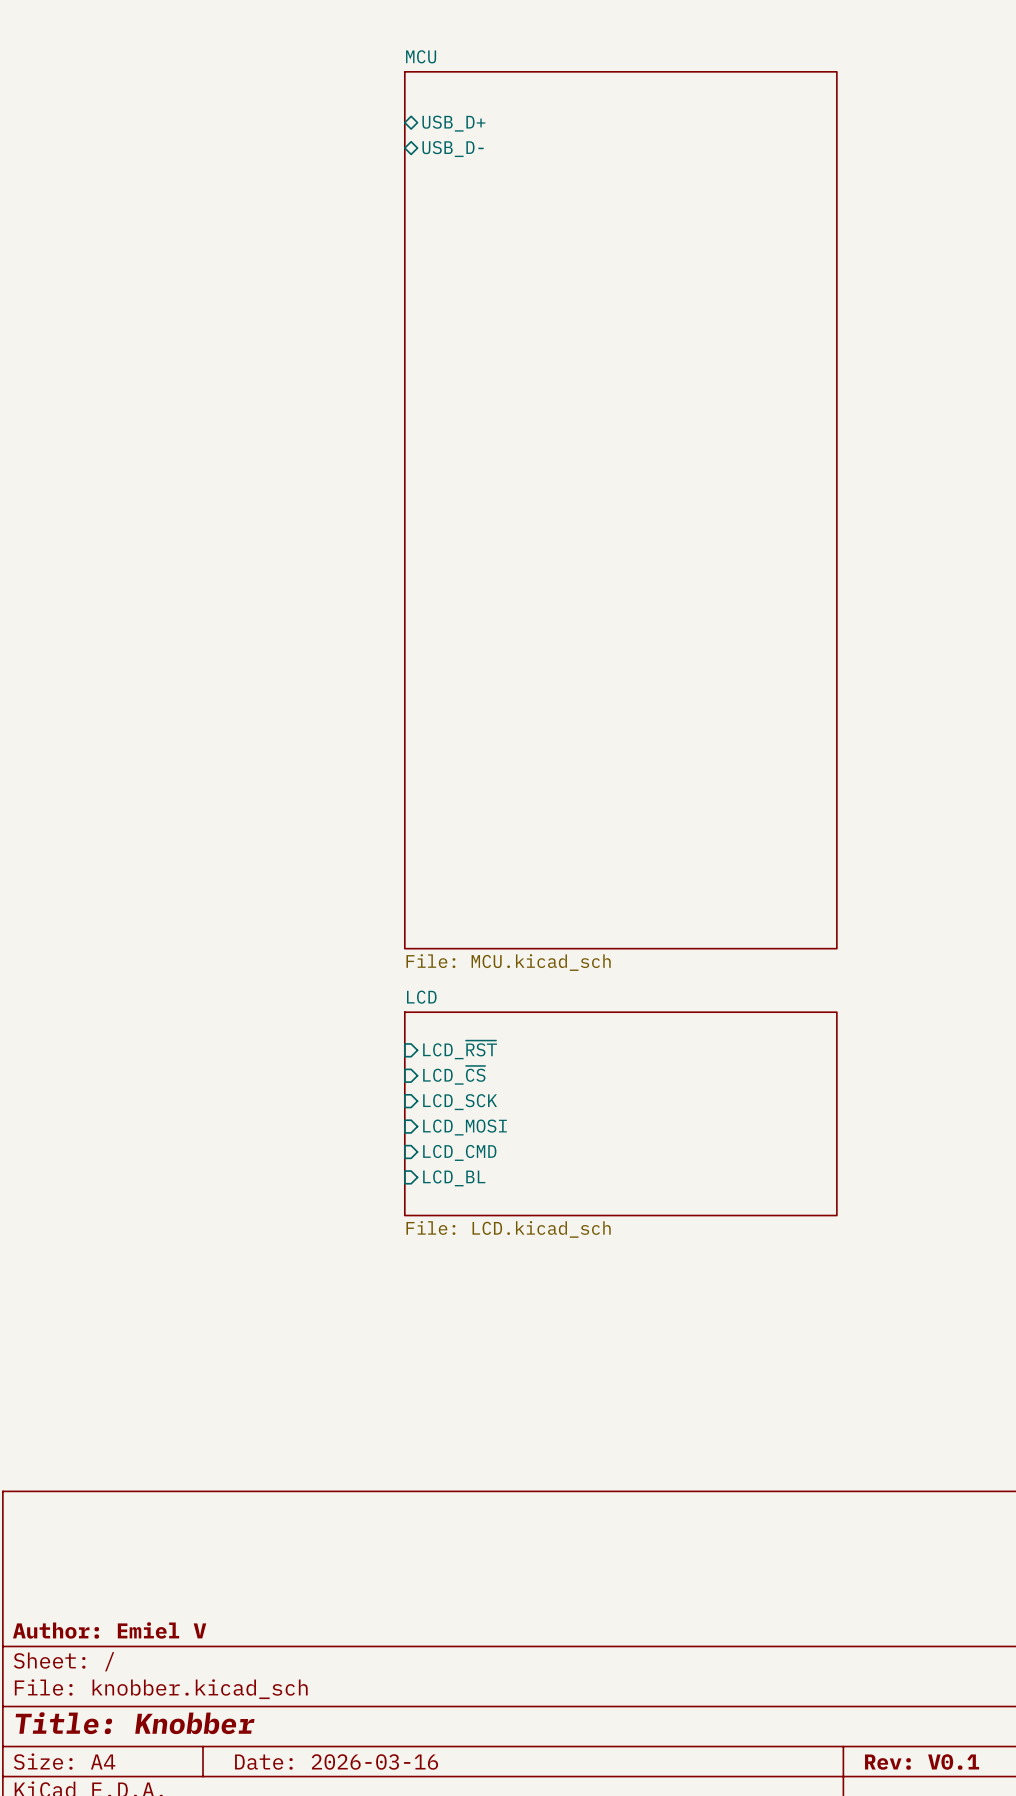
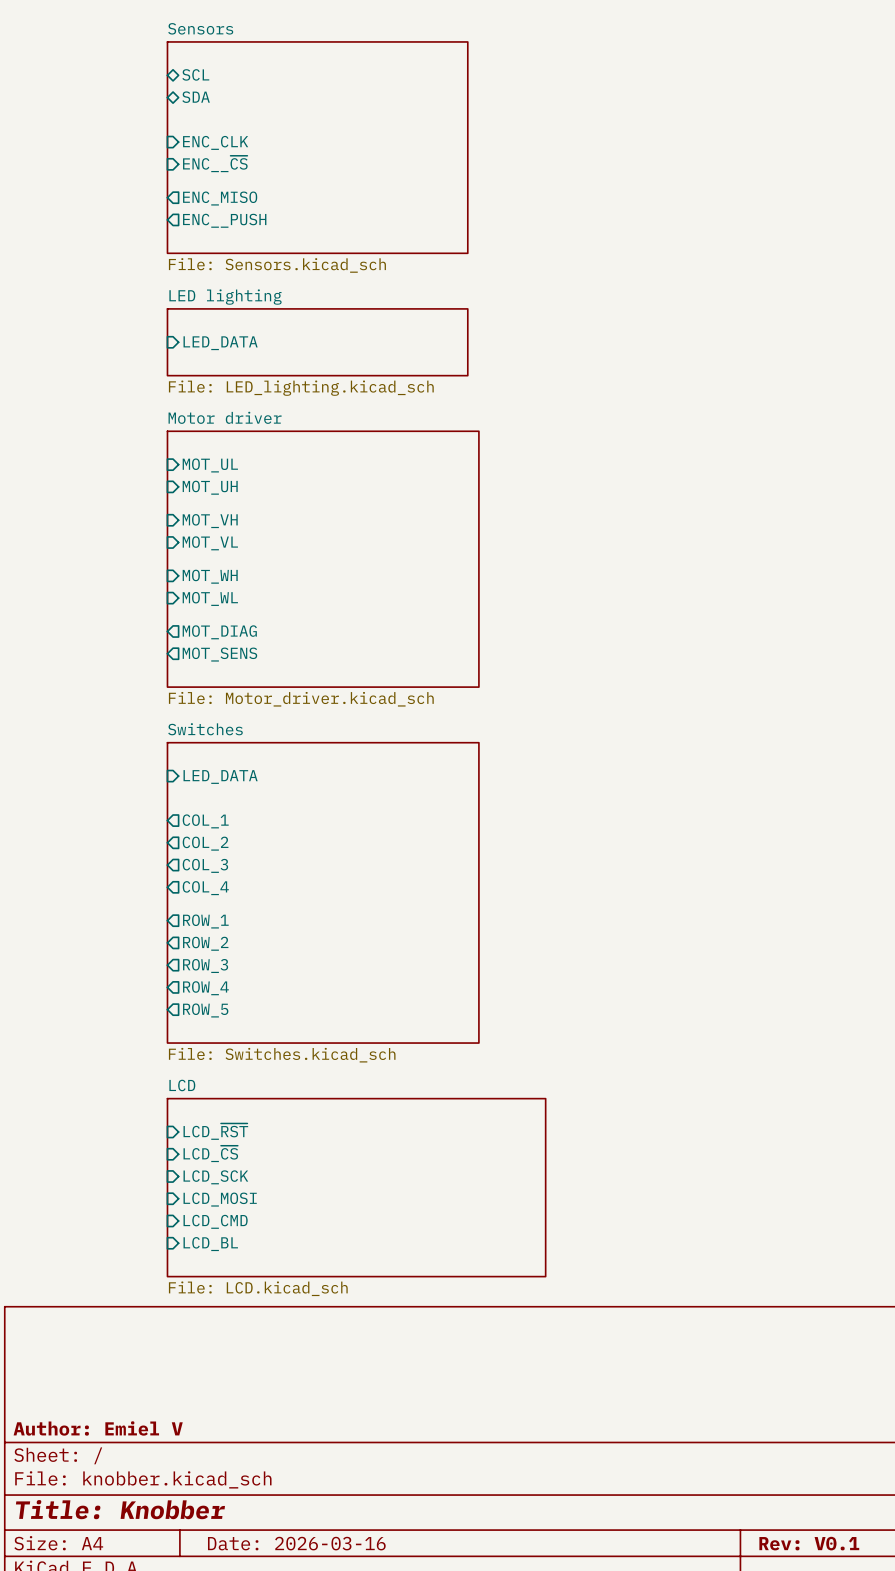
sheet pin: none -> SCL (195, 74)
sheet pin: none -> SDA (196, 97)
sheet pin: USB_D+ (453, 123) -> none
sheet pin: USB_D- (453, 149) -> none
sheet pin: none -> ENC_CLK (215, 142)
sheet Sensors: none -> File: Sensors.kicad_sch (317, 147)
sheet pin: none -> ENC__~{CS} (215, 163)
sheet pin: none -> ENC_MISO (220, 198)
sheet pin: none -> ENC__PUSH (224, 220)
sheet LED lighting: none -> File: LED_lighting.kicad_sch (317, 342)
sheet pin: none -> LED_DATA (220, 343)
sheet MCU: File: MCU.kicad_sch (620, 510) -> none
sheet pin: none -> MOT_UL (210, 465)
sheet pin: none -> MOT_UH (210, 487)
sheet pin: none -> MOT_VH (210, 521)
sheet pin: none -> MOT_VL (210, 543)
sheet Motor driver: none -> File: Motor_driver.kicad_sch (323, 559)
sheet pin: none -> MOT_WH (210, 576)
sheet pin: none -> MOT_WL (210, 598)
sheet pin: none -> MOT_DIAG (219, 632)
sheet pin: none -> MOT_SENS (219, 654)
sheet pin: none -> LED_DATA (220, 777)
sheet pin: none -> COL_1 (205, 821)
sheet pin: none -> COL_2 (205, 843)
sheet pin: none -> COL_3 (205, 865)
sheet pin: none -> COL_4 (205, 888)
sheet Switches: none -> File: Switches.kicad_sch (323, 892)
sheet pin: LCD_~{RST} (460, 1049) -> none
sheet pin: none -> ROW_1 (205, 921)
sheet pin: LCD_~{CS} (454, 1075) -> none
sheet pin: none -> ROW_2 (205, 943)
sheet pin: none -> ROW_3 (205, 966)
sheet pin: LCD_SCK (460, 1102) -> none
sheet LCD: File: LCD.kicad_sch (620, 1113) -> none
sheet pin: none -> ROW_4 (205, 988)
sheet pin: LCD_MOSI (464, 1127) -> none
sheet pin: none -> ROW_5 (205, 1010)
sheet pin: LCD_CMD (459, 1152) -> none
sheet pin: LCD_BL (454, 1178) -> none
sheet pin: none -> LCD_~{RST} (215, 1131)
sheet pin: none -> LCD_~{CS} (210, 1153)
sheet pin: none -> LCD_SCK (215, 1177)
sheet LCD: none -> File: LCD.kicad_sch (356, 1187)
sheet pin: none -> LCD_MOSI (220, 1199)
sheet pin: none -> LCD_CMD (215, 1221)
sheet pin: none -> LCD_BL (210, 1244)

